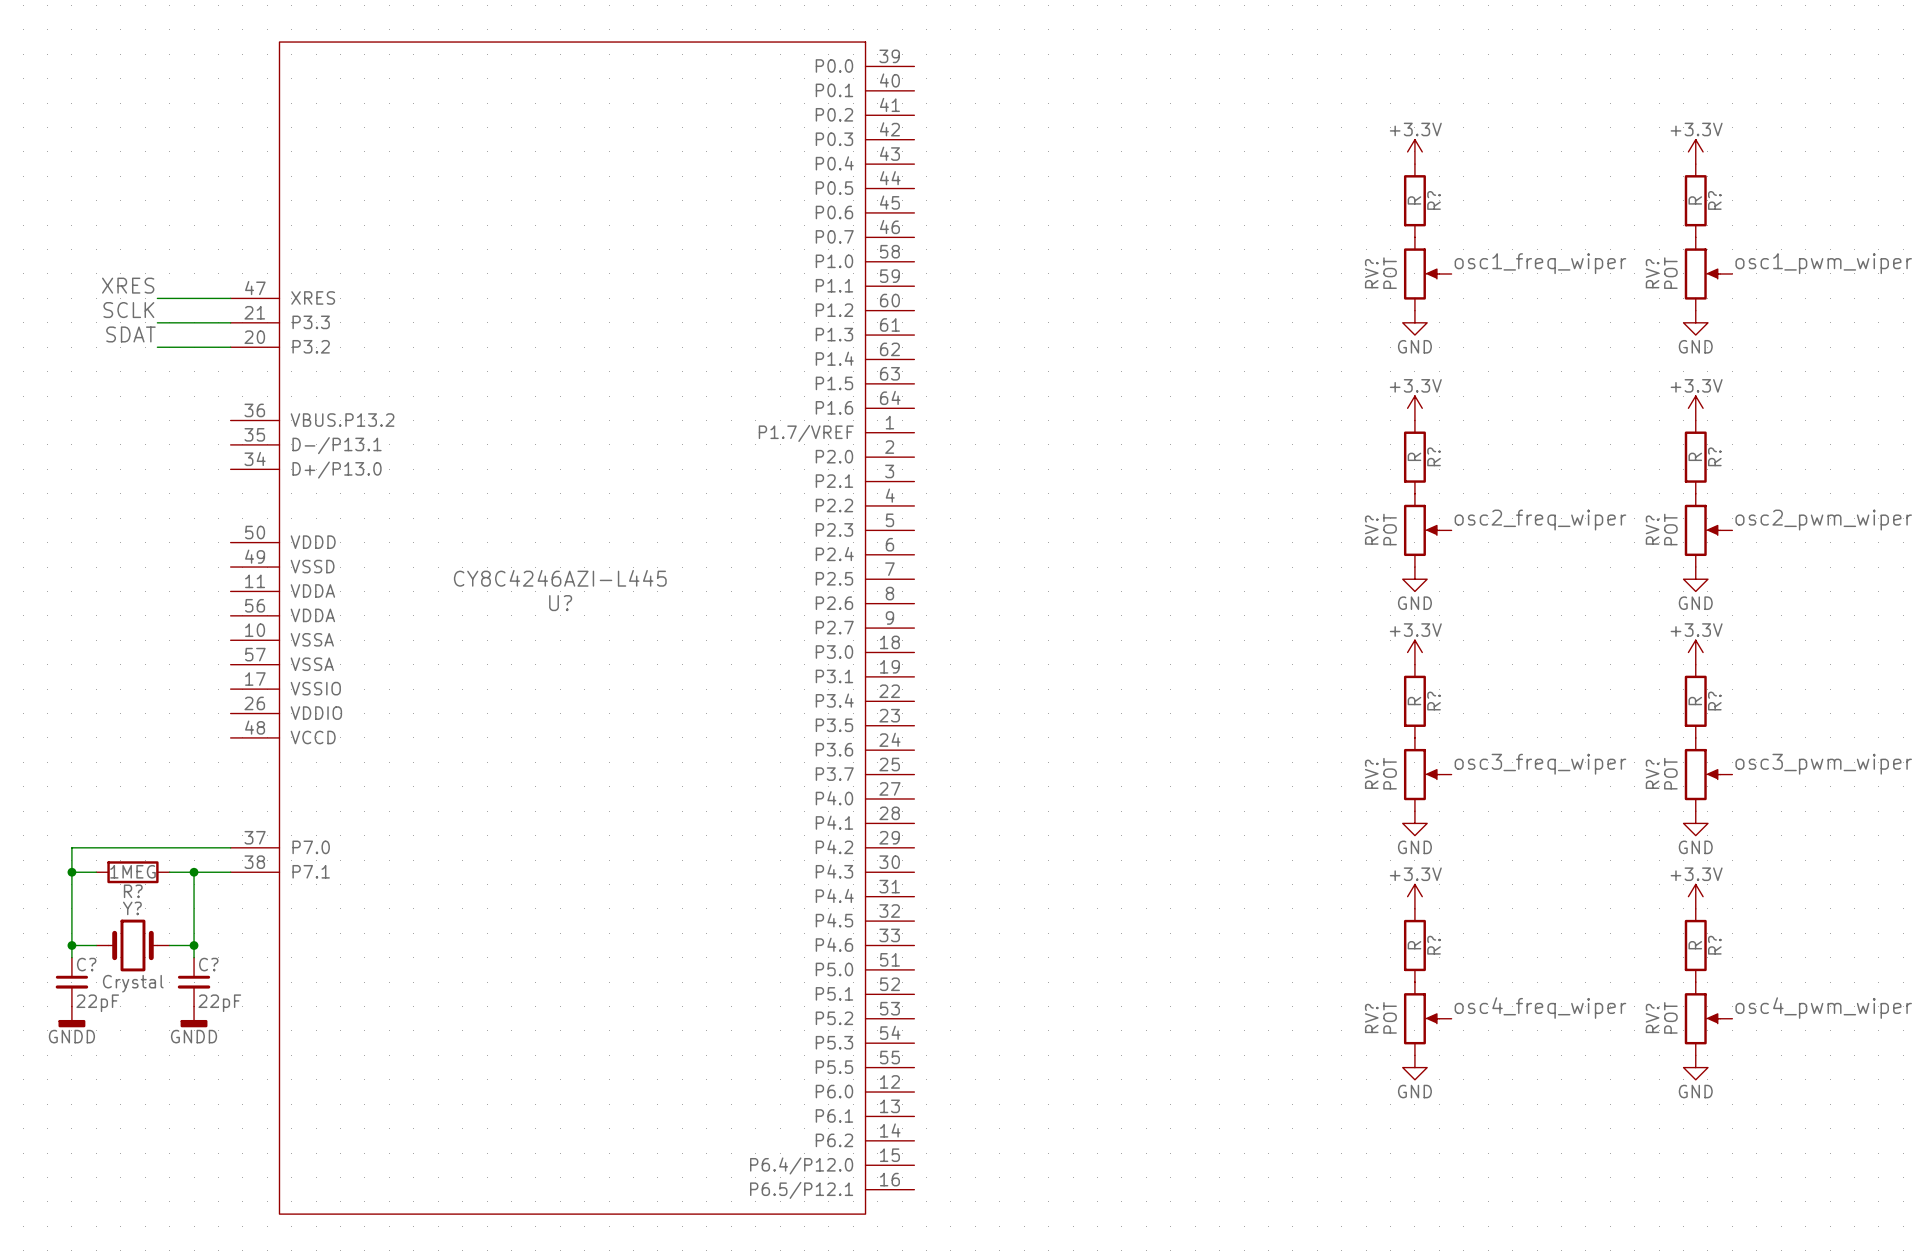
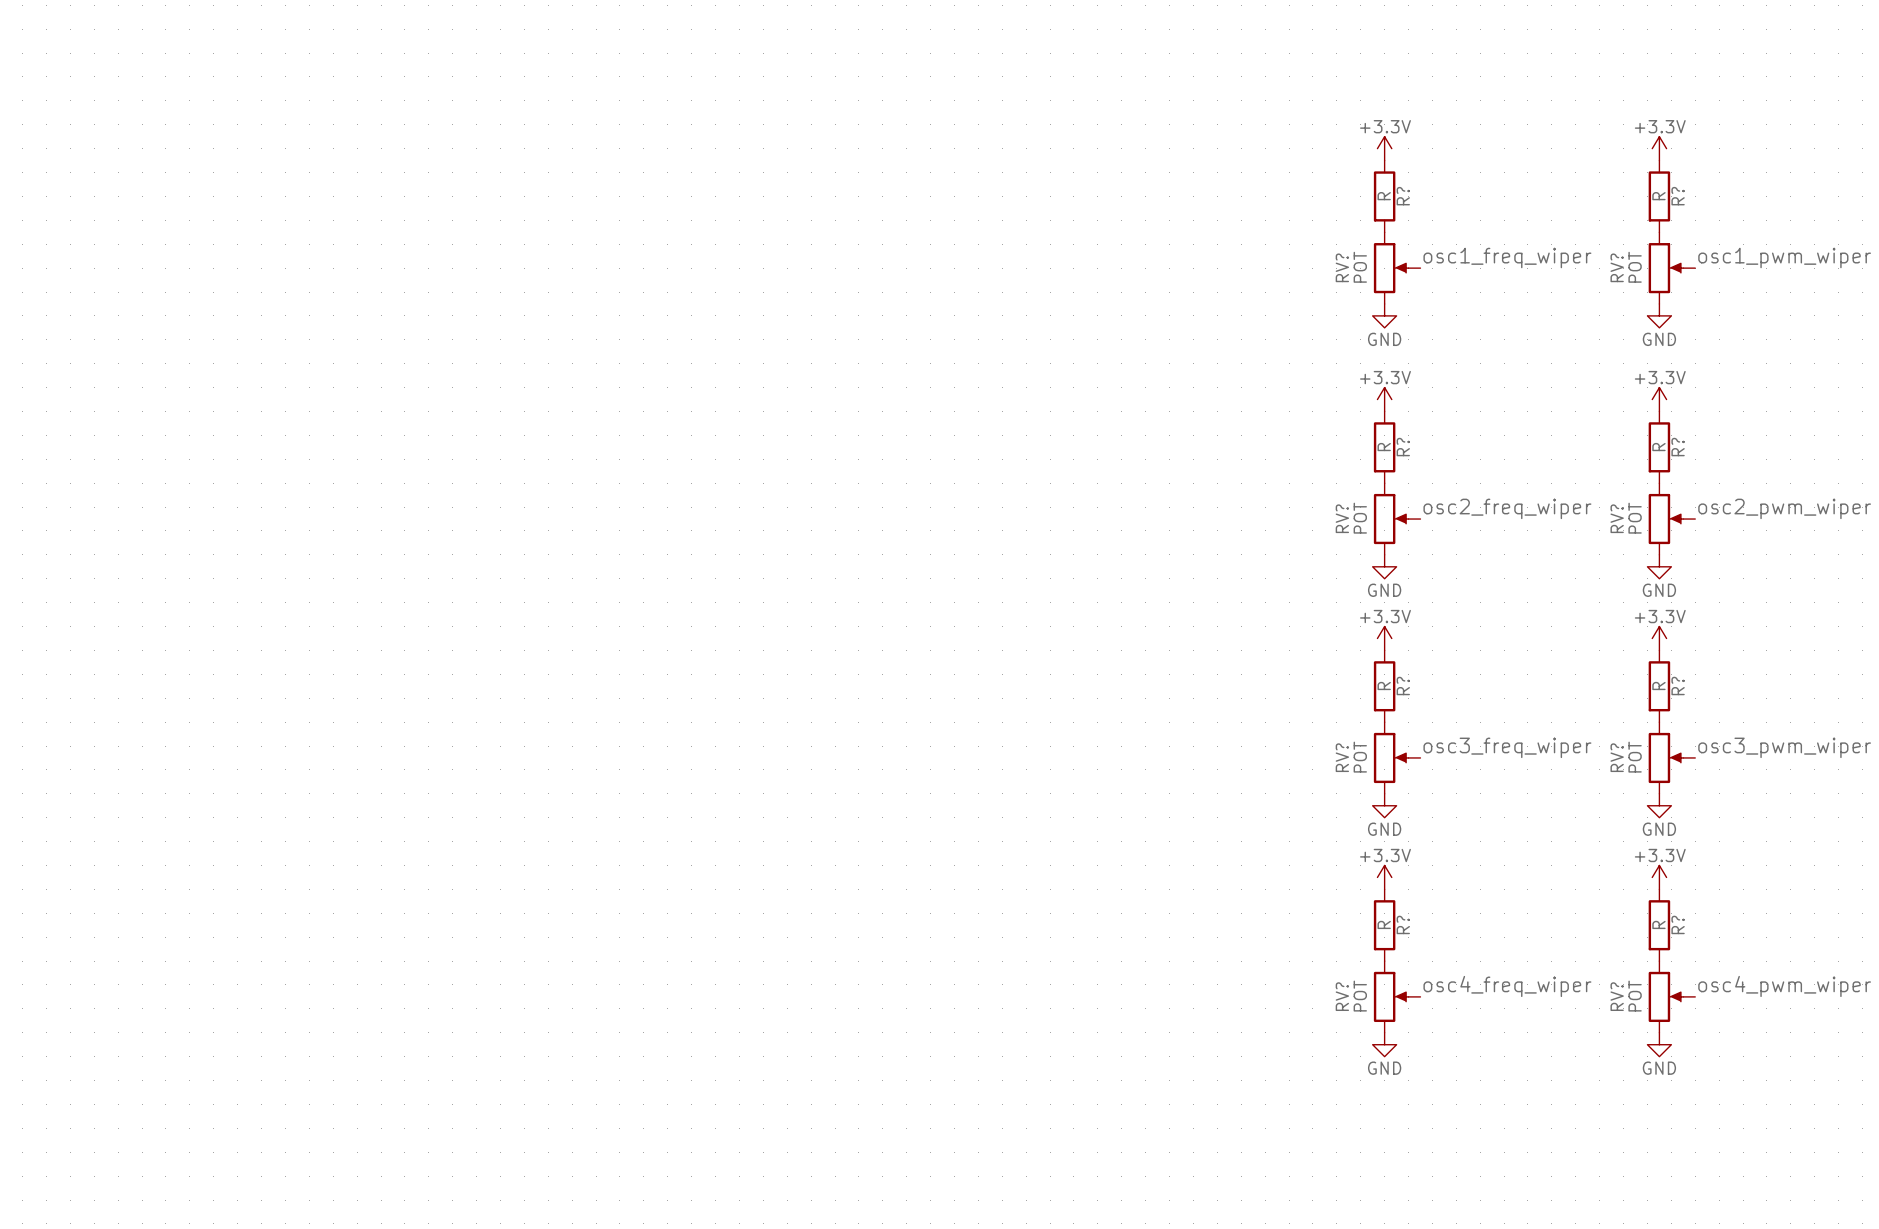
label: XRES (128, 285) -> none
wire: (157, 298) (230, 298) -> none
label: SCLK (128, 310) -> none
wire: (157, 322) (230, 322) -> none
label: SDAT (130, 334) -> none
wire: (157, 347) (230, 347) -> none
U?: CY8C4246AZI-L445 (572, 628) -> none
wire: (230, 847) (71, 847) (71, 957) -> none
wire: (71, 872) (96, 872) -> none
junction: (71, 872) -> none
R?: 1MEG (132, 872) -> none
wire: (169, 872) (230, 872) -> none
wire: (194, 872) (194, 957) -> none
junction: (194, 872) -> none
wire: (71, 945) (96, 945) -> none
junction: (71, 945) -> none
Y?: Crystal (132, 945) -> none
wire: (169, 945) (194, 945) -> none
junction: (194, 945) -> none
C?: 22pF (71, 982) -> none
C?: 22pF (194, 982) -> none
power symbol: GNDD (71, 1016) -> none
power symbol: GNDD (194, 1016) -> none

